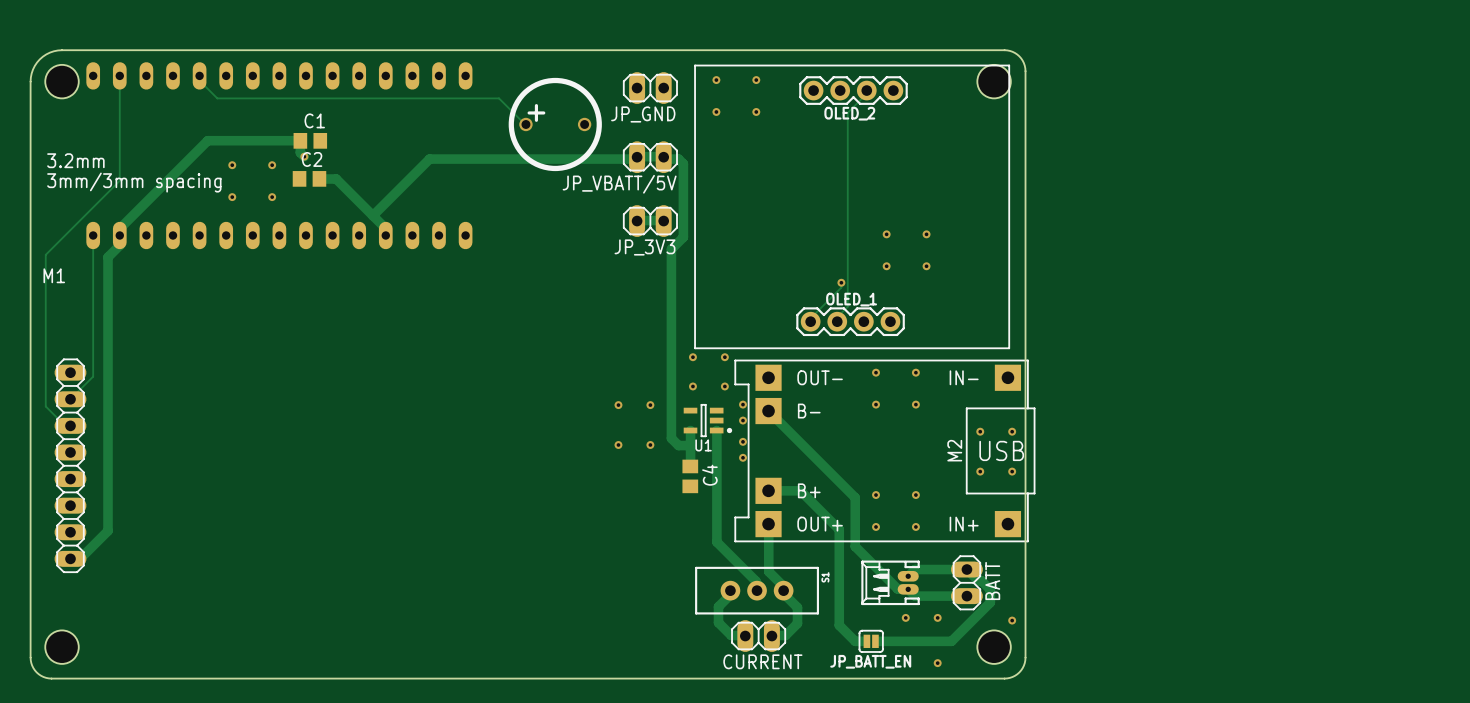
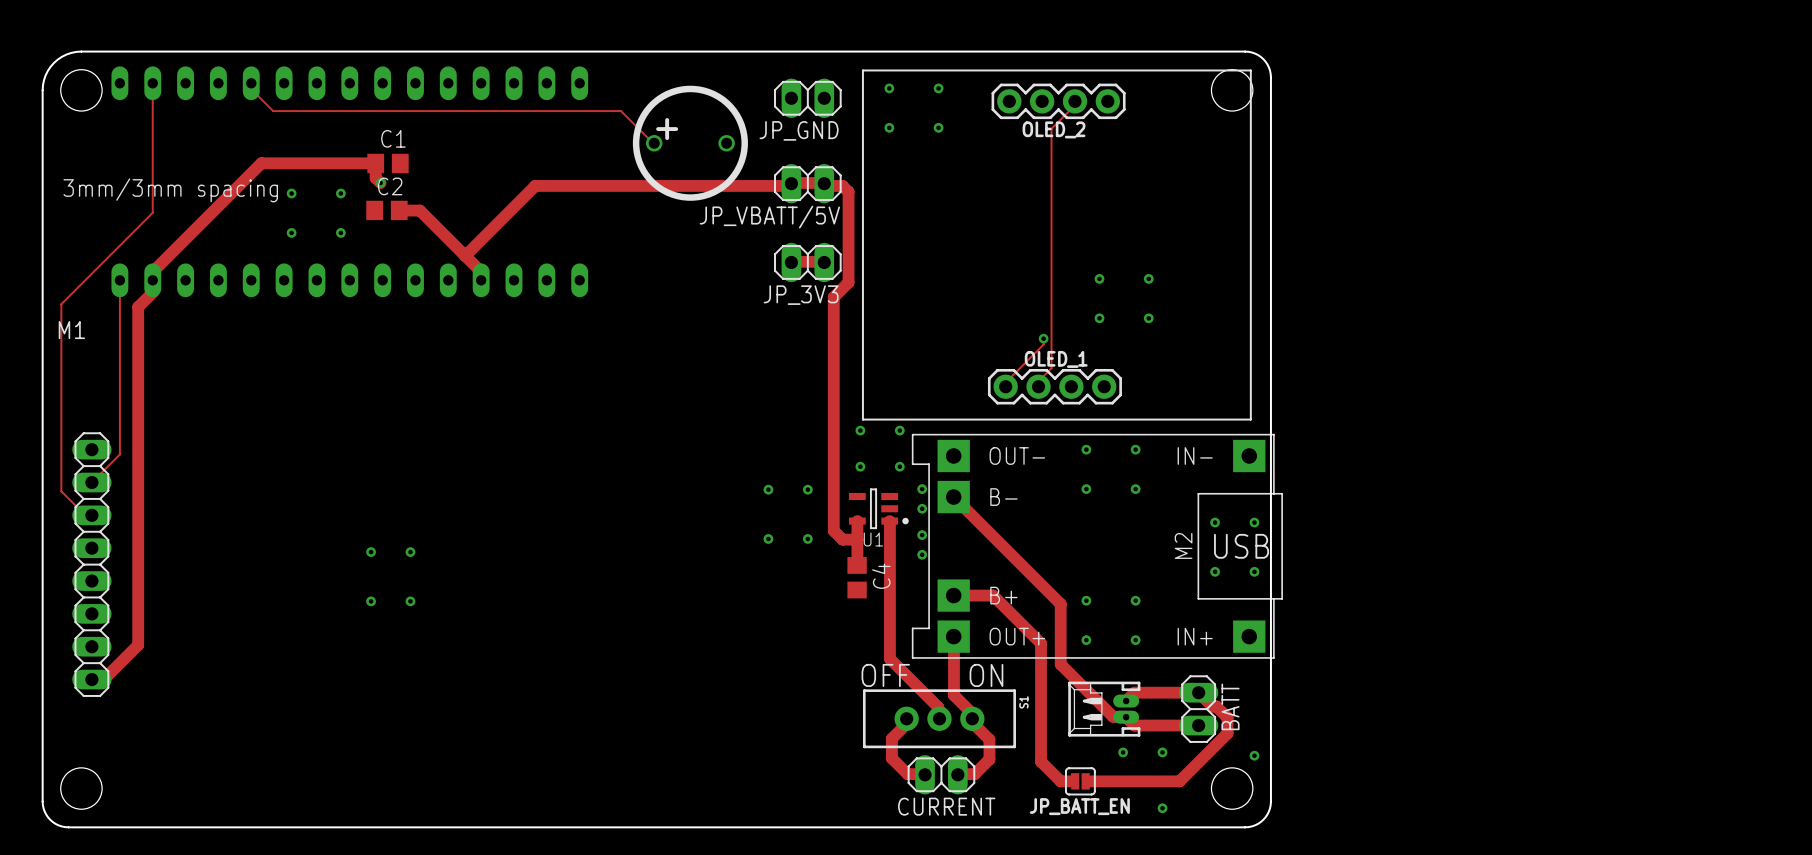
text: 3.2mm (75, 160) -> 3mm/3mm spacing (170, 190)
text: 3mm/3mm spacing (134, 182) -> none
via: none -> (371, 552)
via: none -> (410, 552)
via: none -> (371, 601)
via: none -> (410, 601)
text: none -> OFF (885, 675)
text: none -> ON (986, 675)

